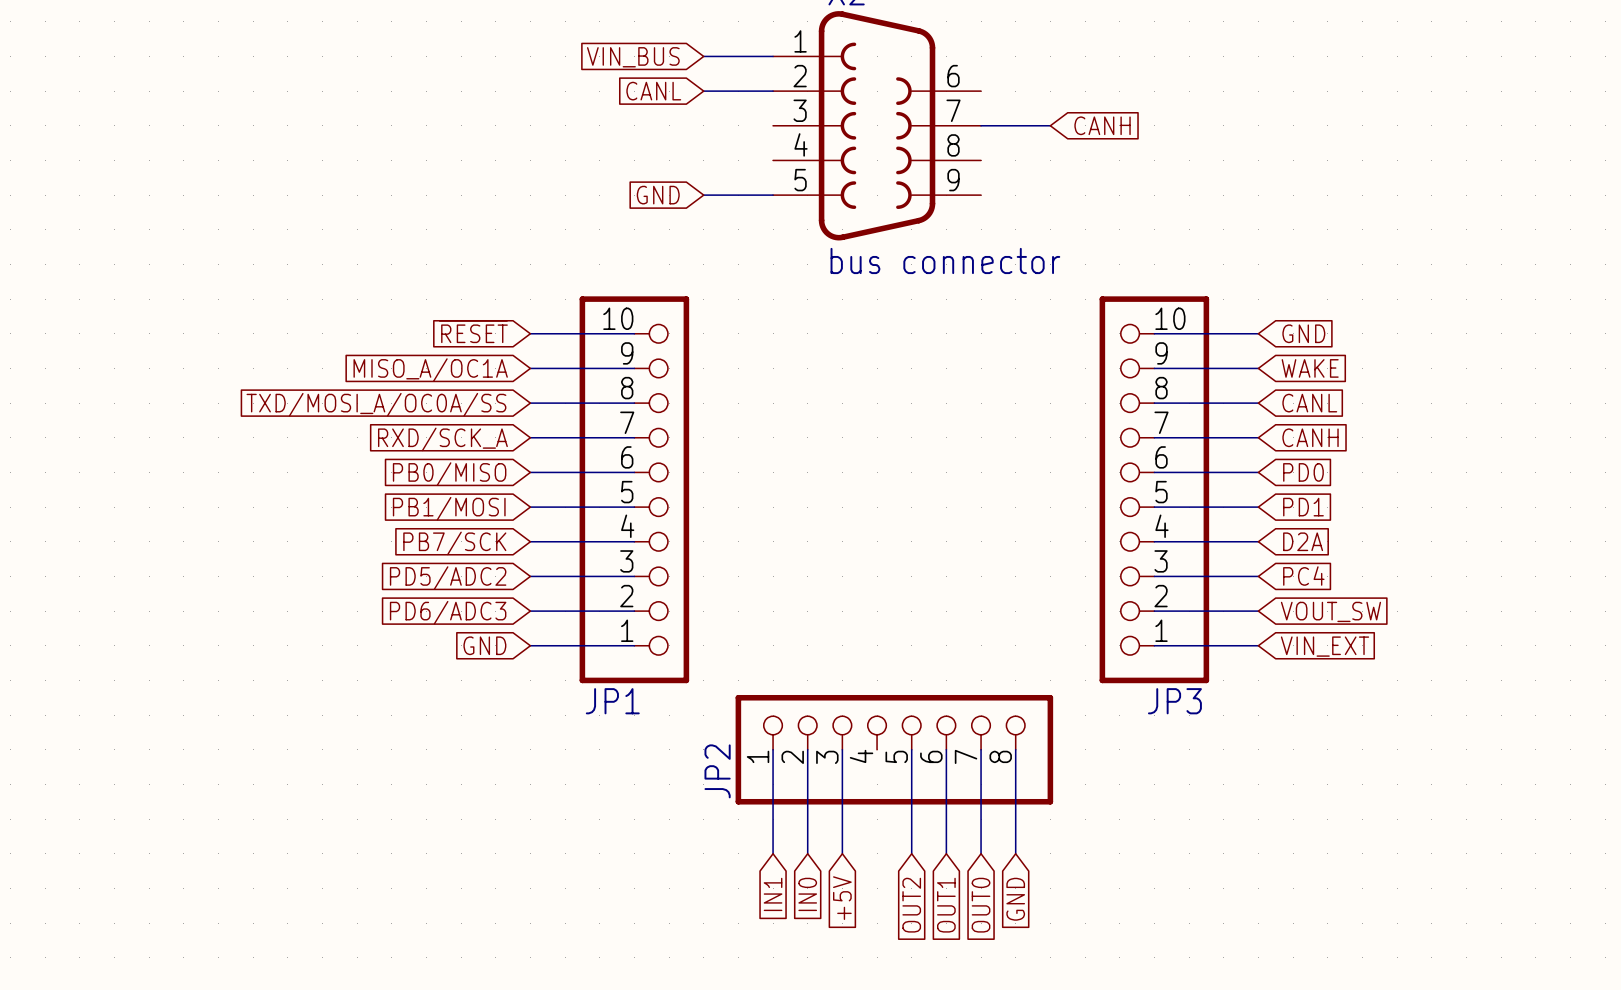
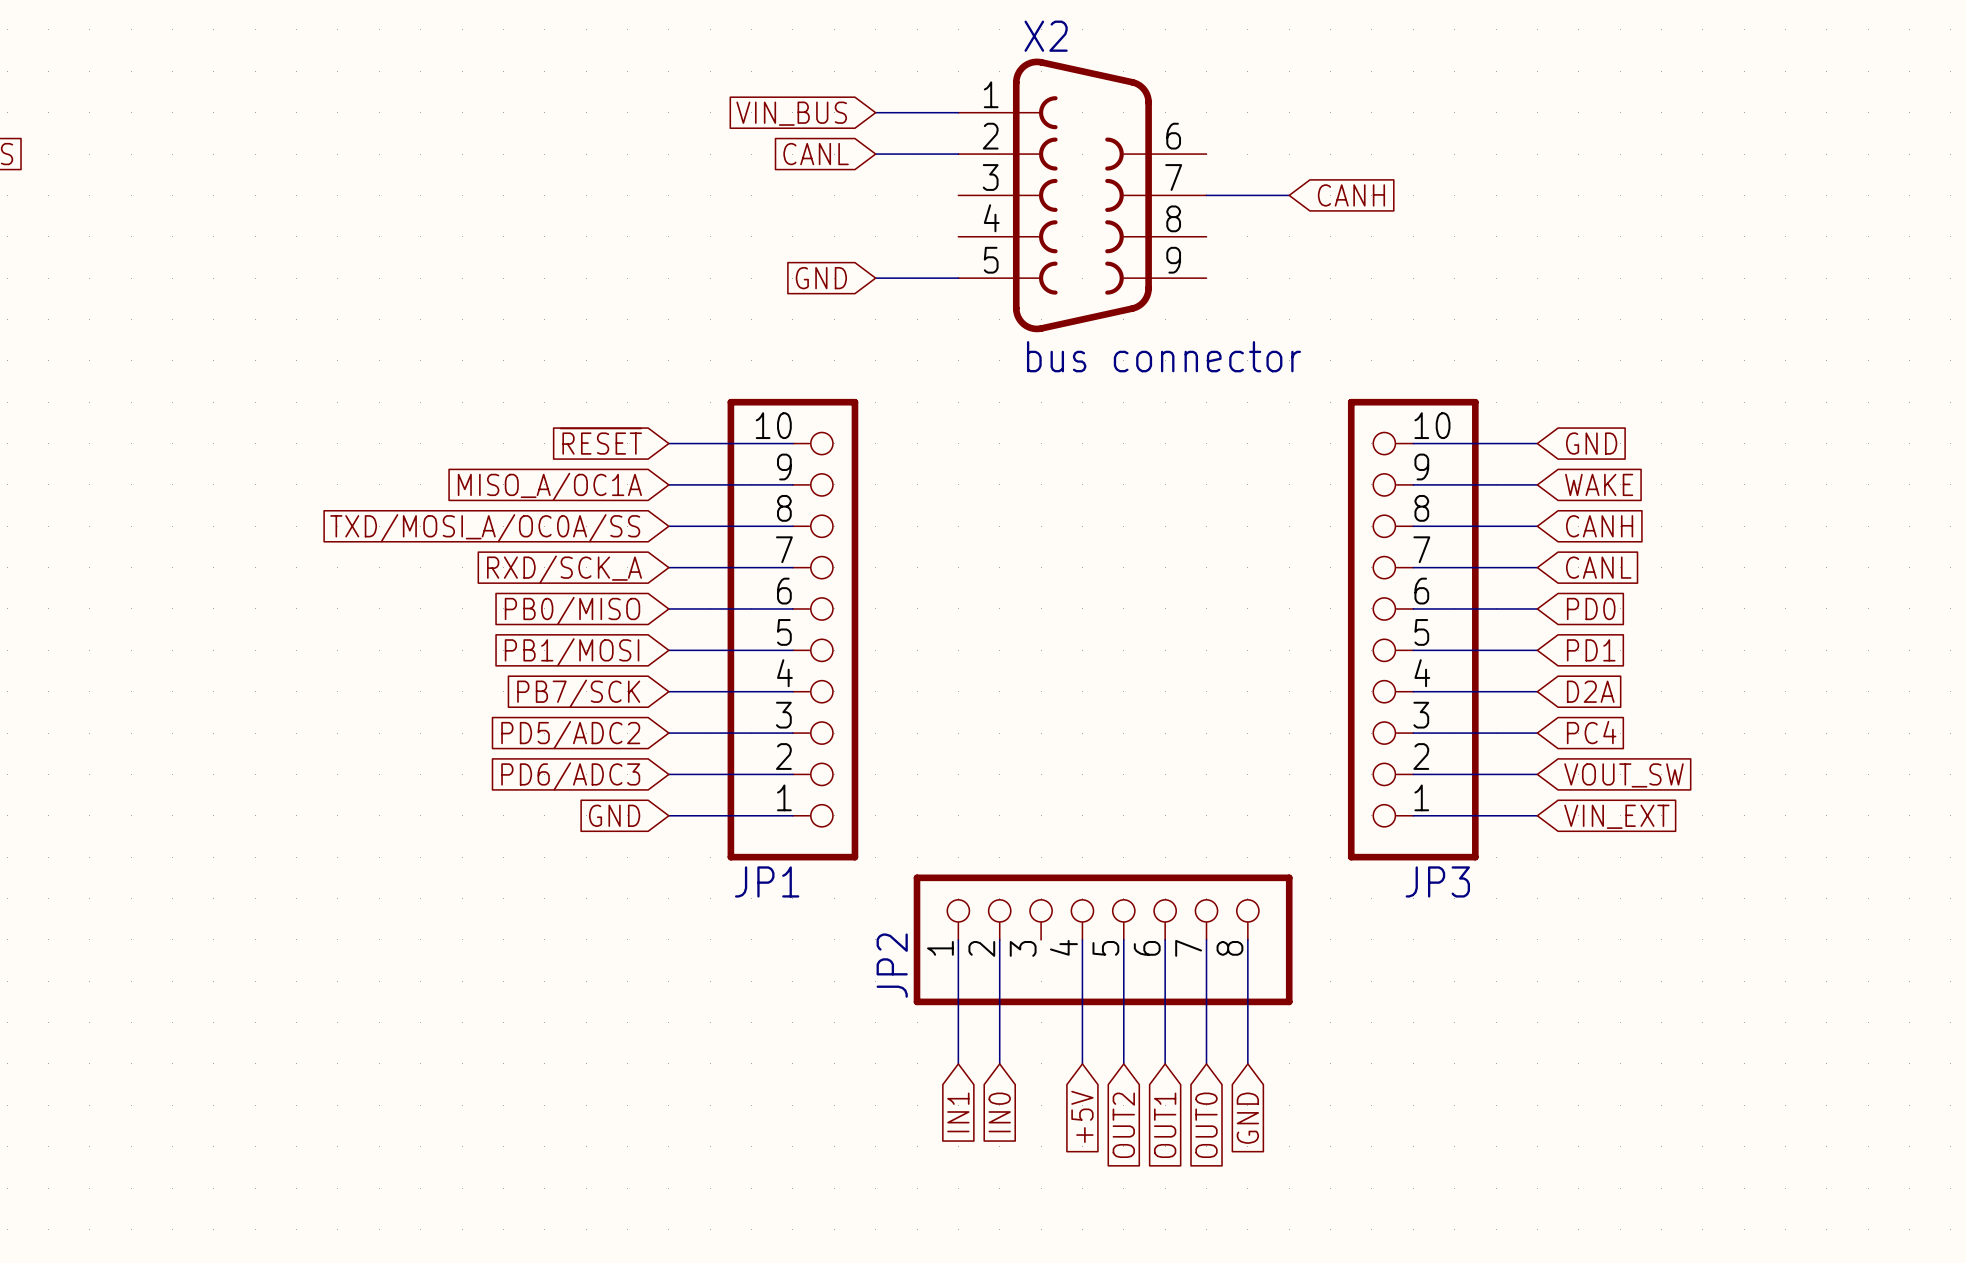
global label: CANL (1309, 403) -> CANH (1599, 526)
global label: CANH (1310, 437) -> CANL (1598, 567)
wire: (842, 749) (842, 853) -> (1082, 939) (1082, 1063)
global label position: +5V (842, 898) -> +5V (1082, 1116)

